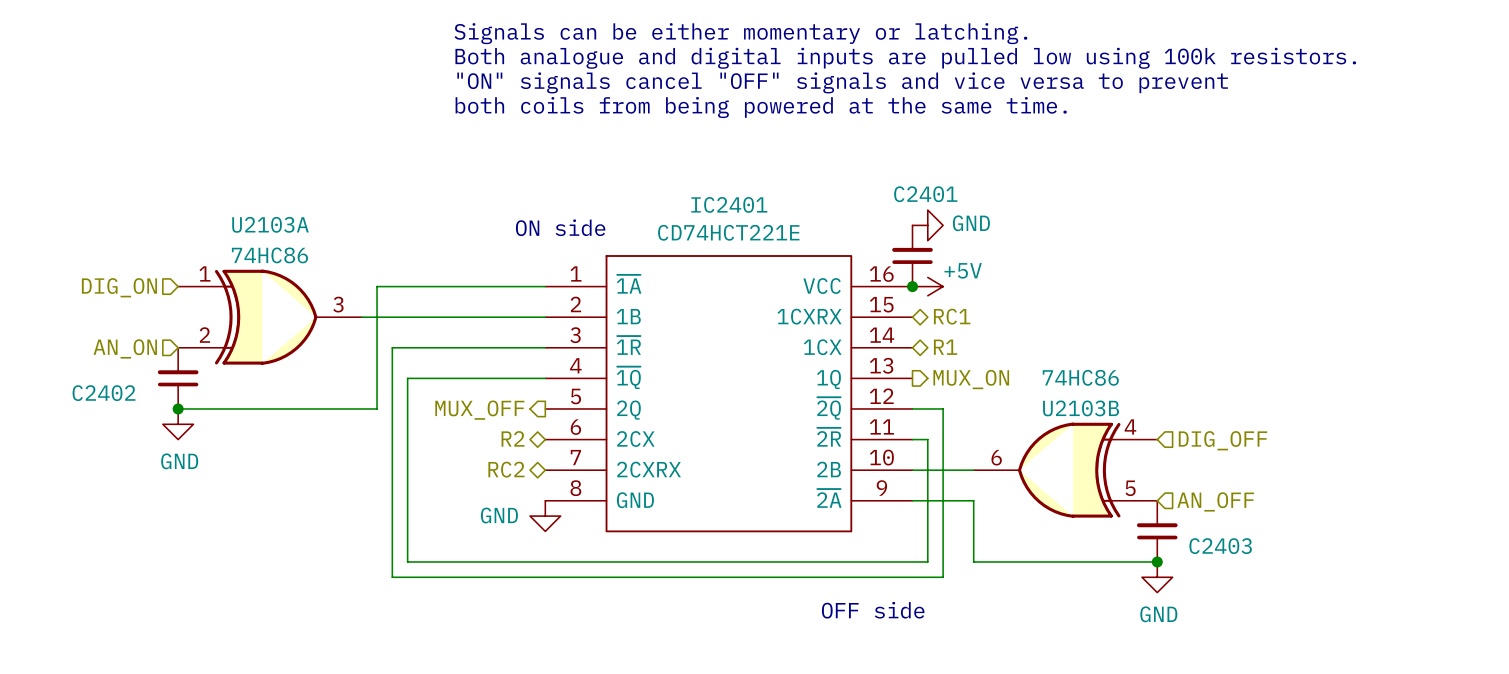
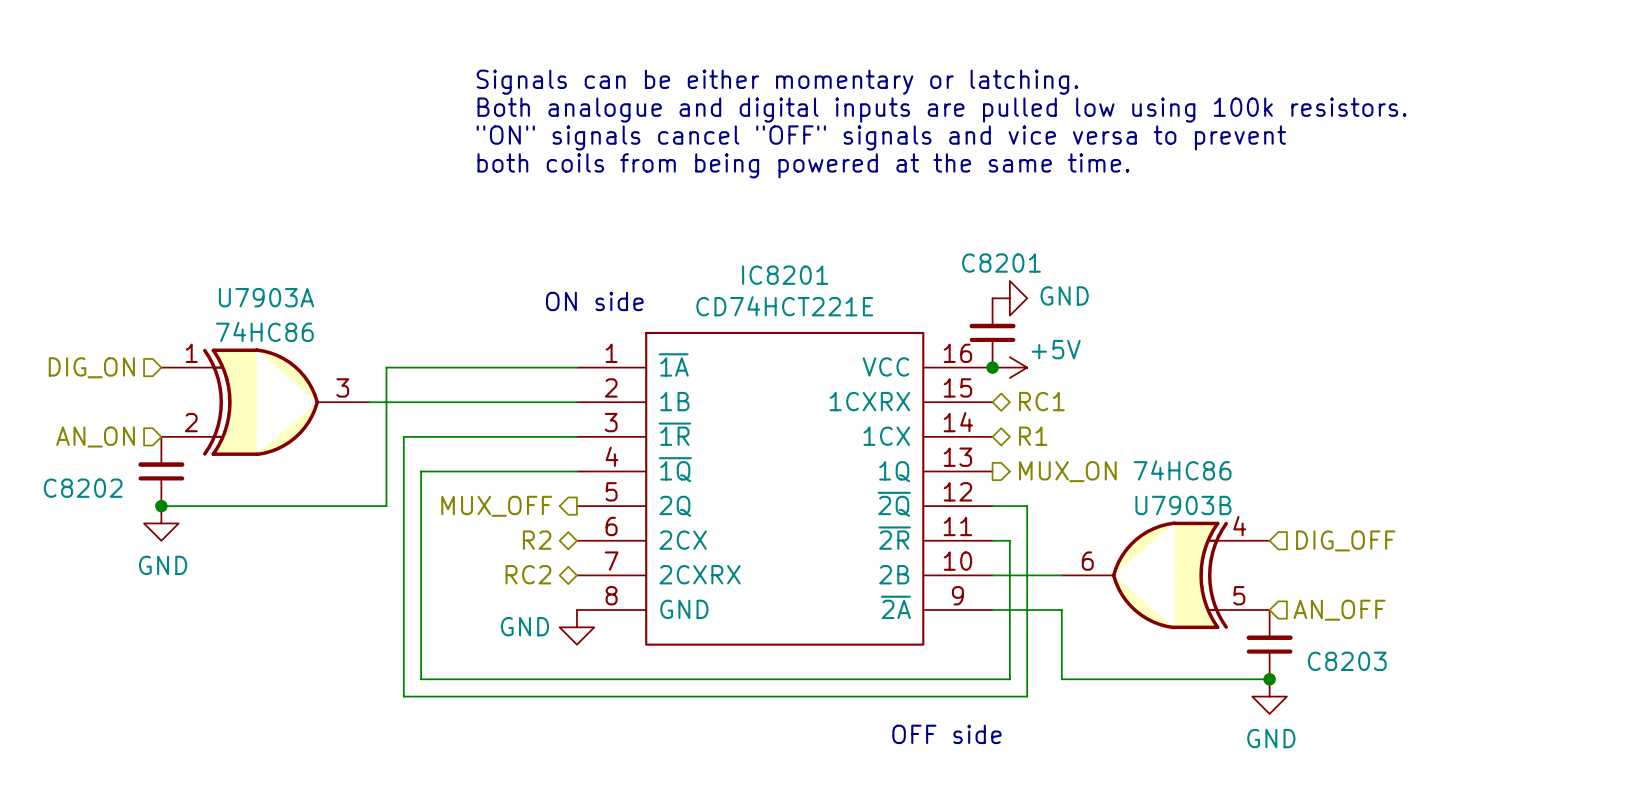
C2401 name: C2401 (925, 194) -> C8201 (1001, 263)
IC2401 name: IC2401 (729, 204) -> IC8201 (785, 275)
U2103A name: U2103A (270, 224) -> U7903A (266, 297)
C2402 name: C2402 (104, 393) -> C8202 (83, 488)
U2103B name: U2103B (1081, 408) -> U7903B (1183, 505)
C2403 name: C2403 (1220, 546) -> C8203 (1347, 661)

